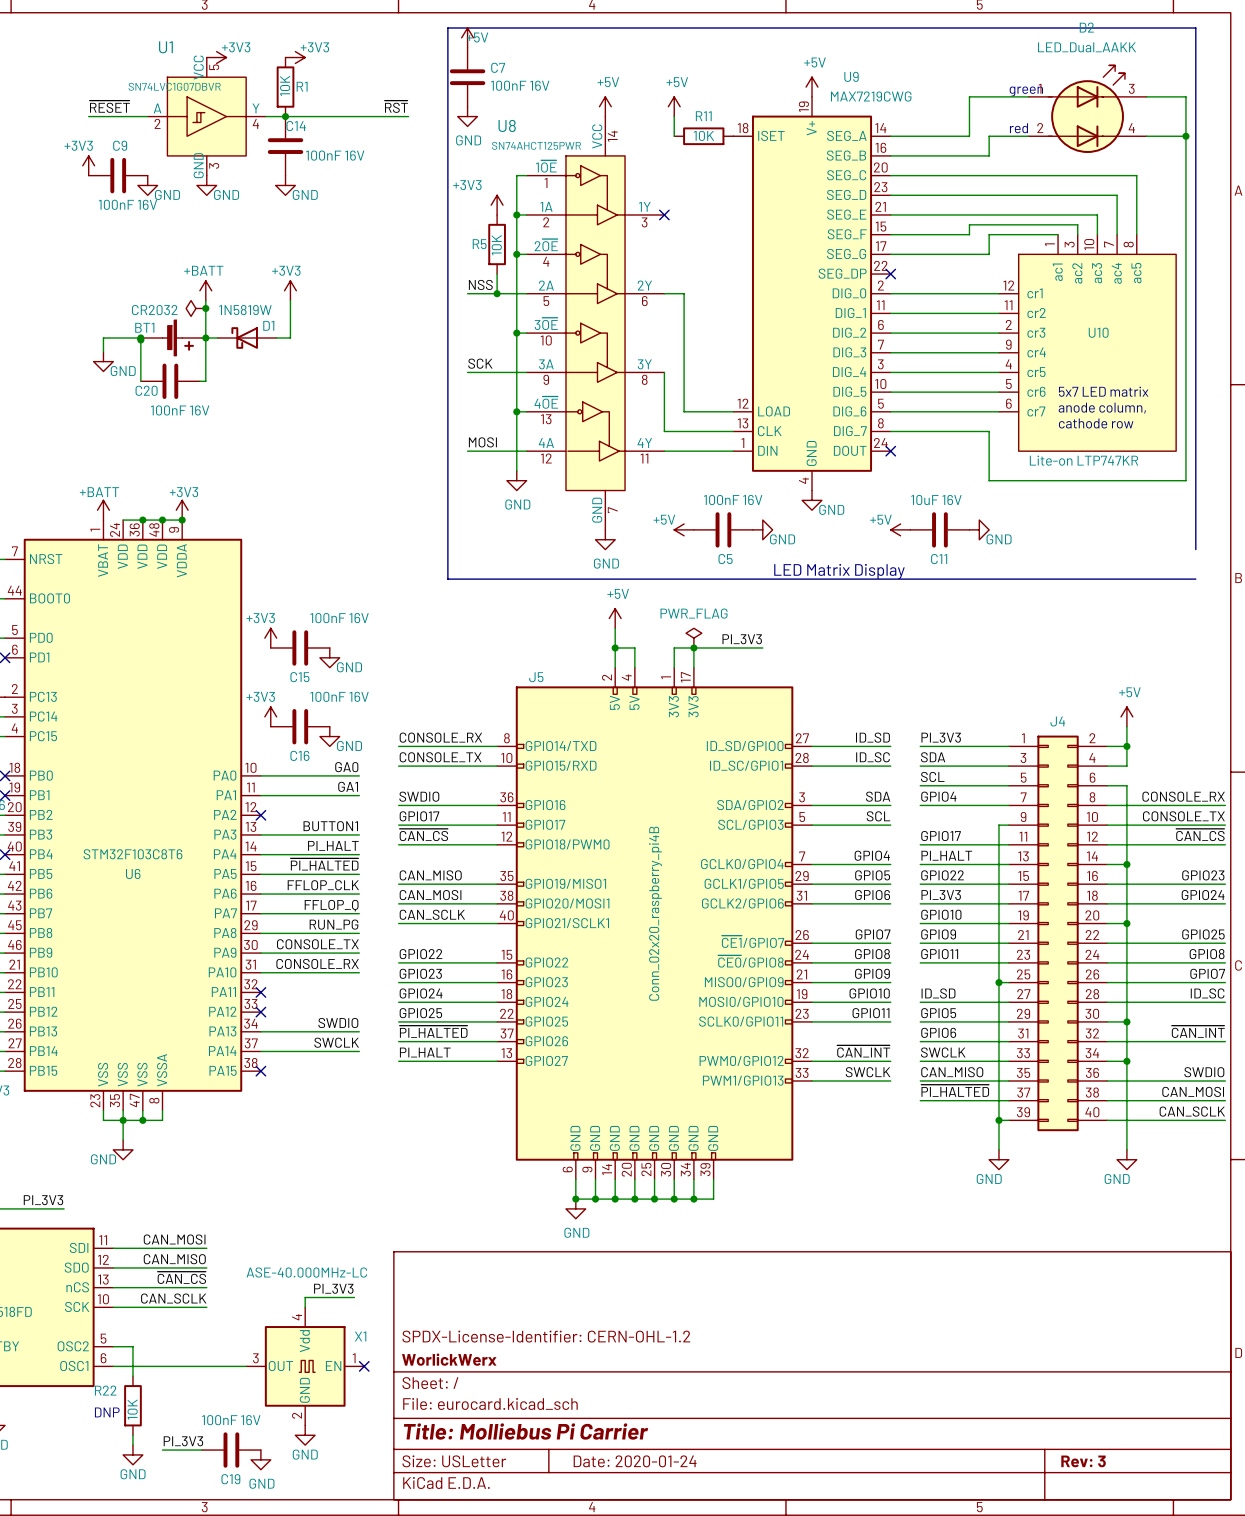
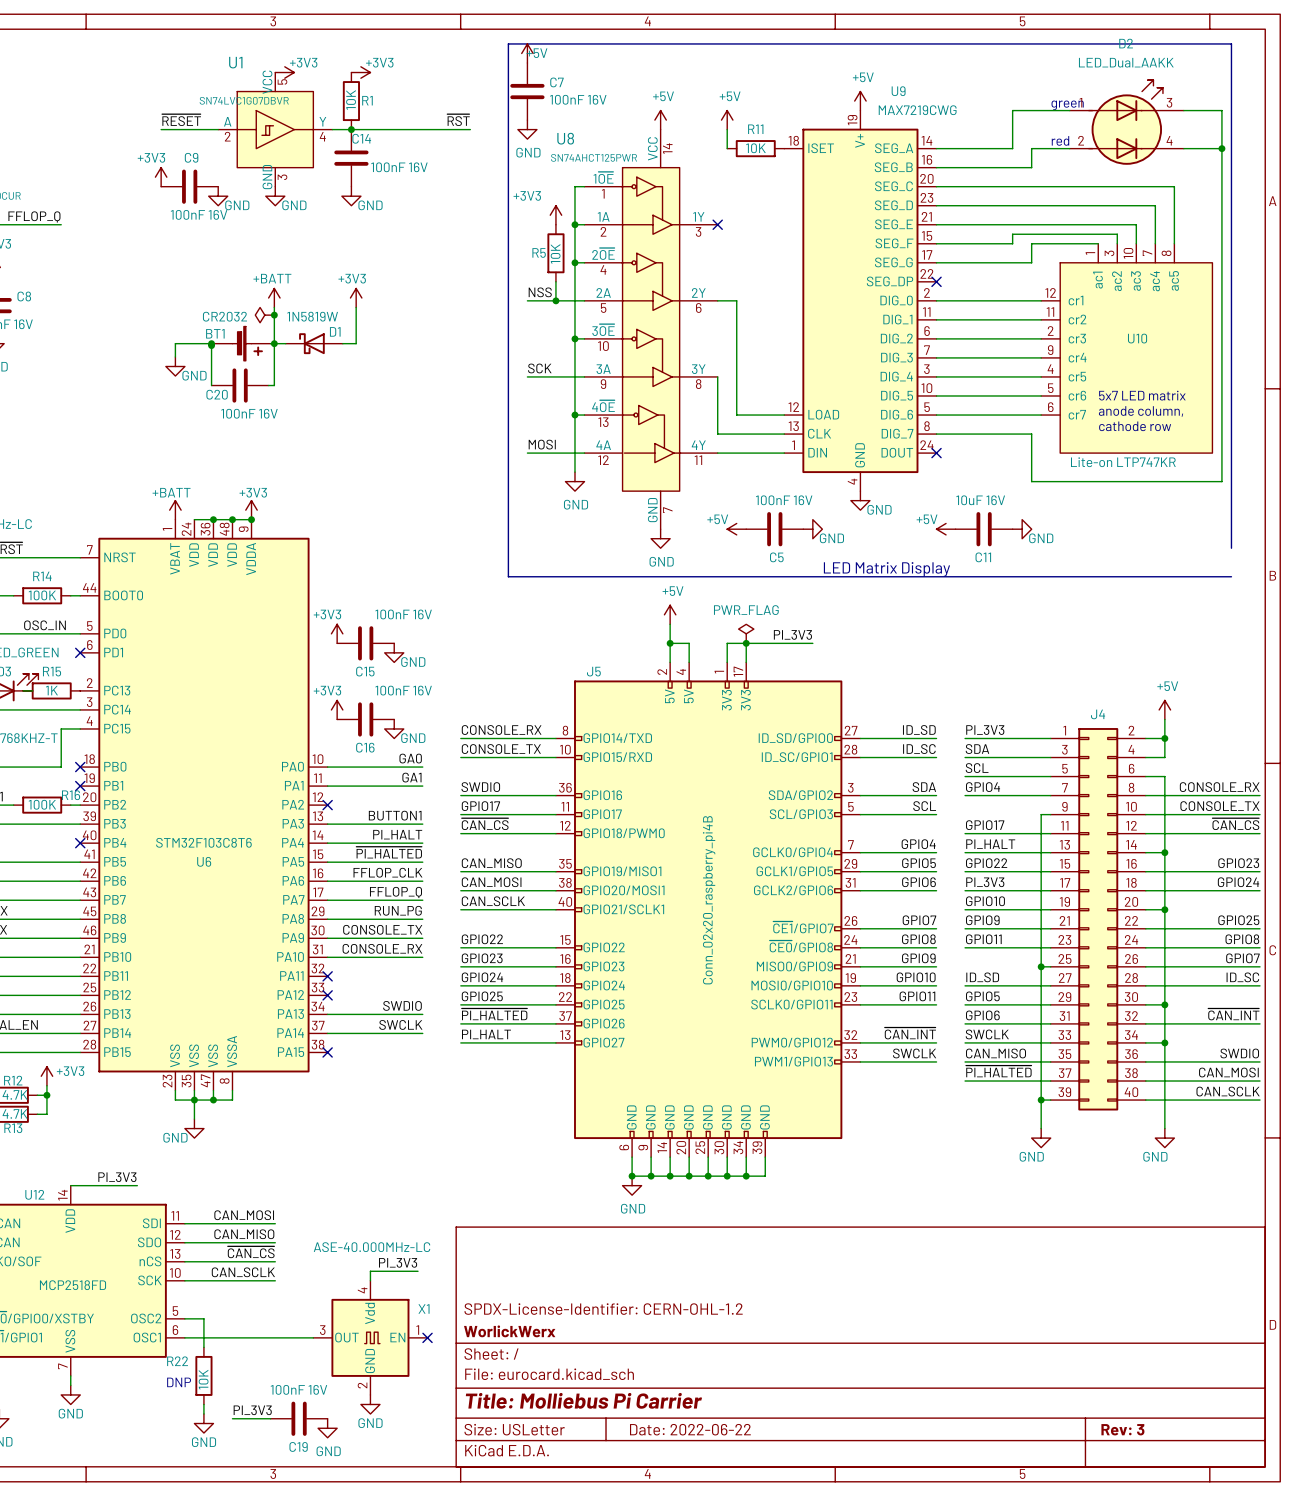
title block: Date: 2020-01-24 (635, 1461) -> Date: 2022-06-22 (690, 1429)

